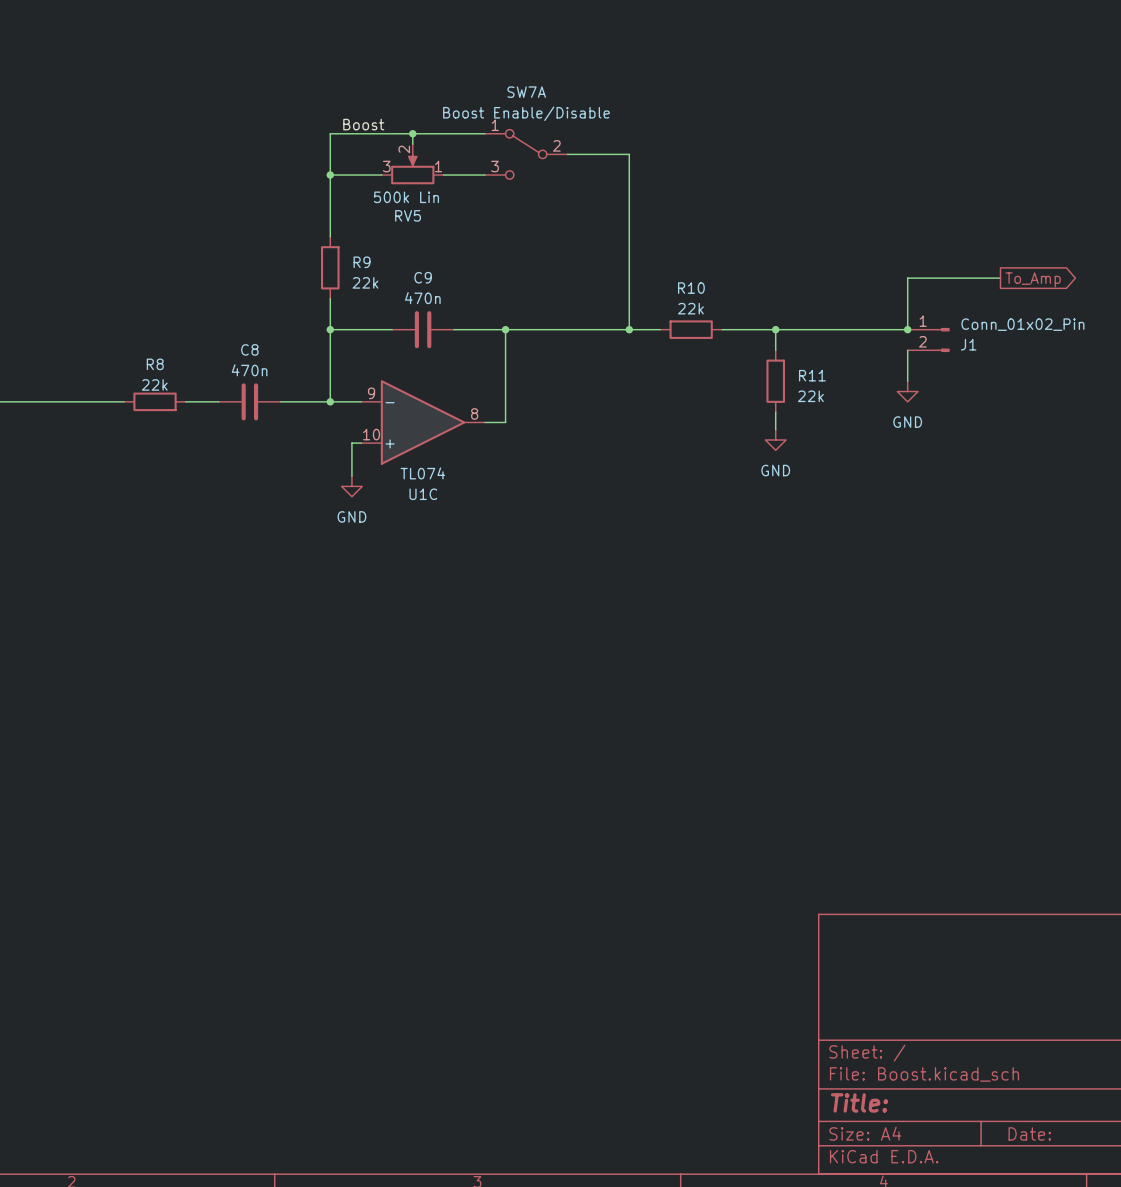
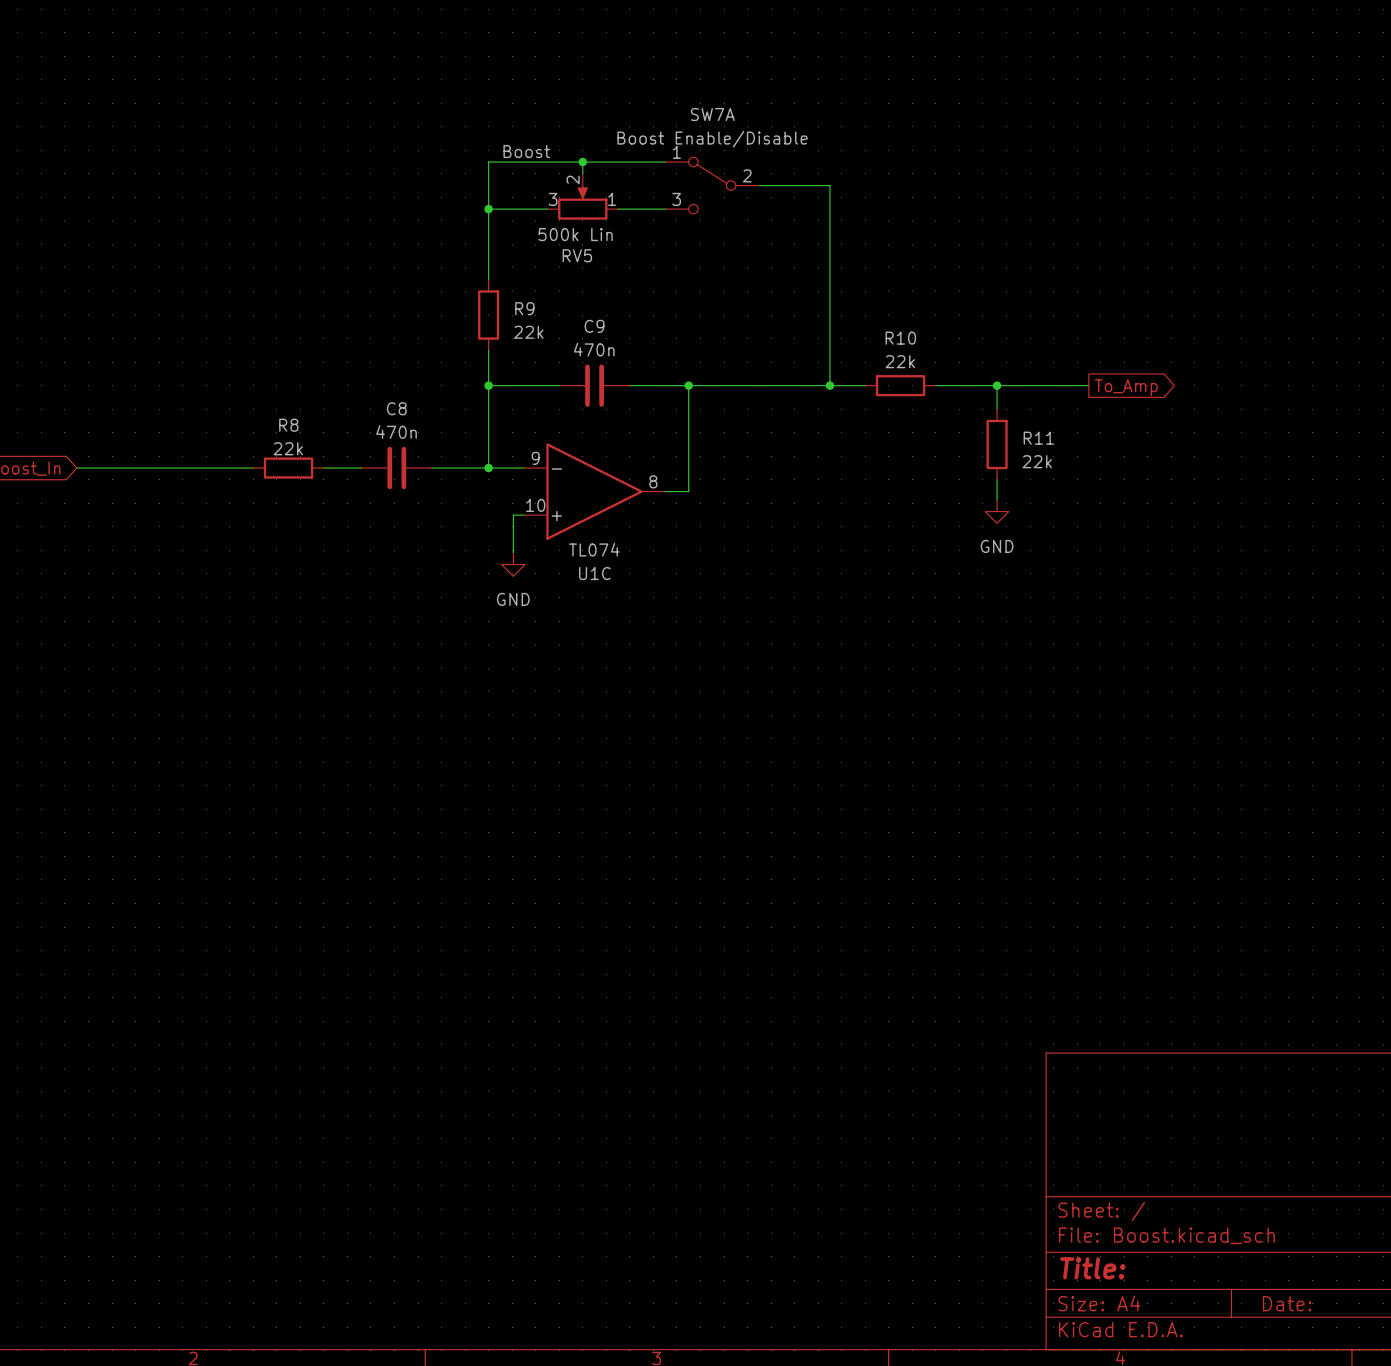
wire: (1000, 278) (907, 278) (907, 329) (856, 329) -> none
global label position: To_Amp (1033, 279) -> To_Amp (1126, 387)
junction: (907, 329) -> none
J1: Conn_01x02_Pin (928, 339) -> none
wire: (907, 350) (907, 381) -> none
power symbol: GND (907, 391) -> none

